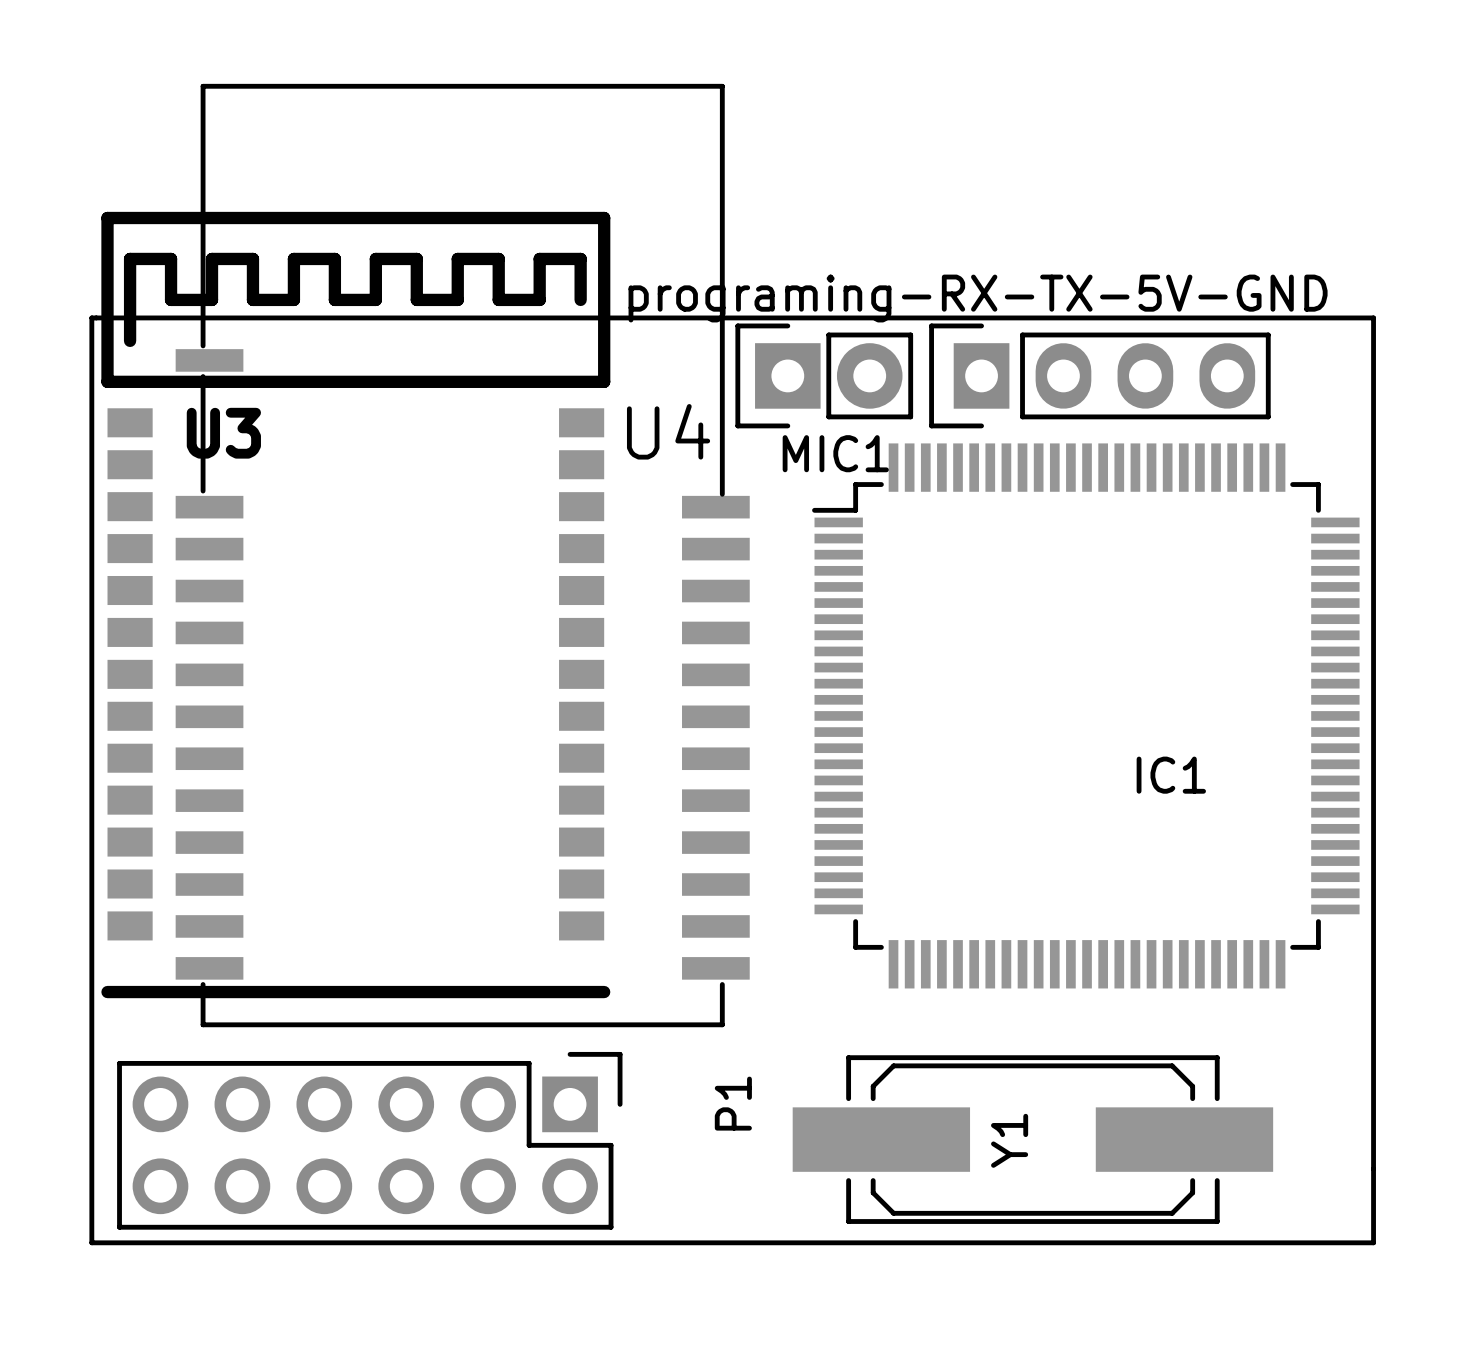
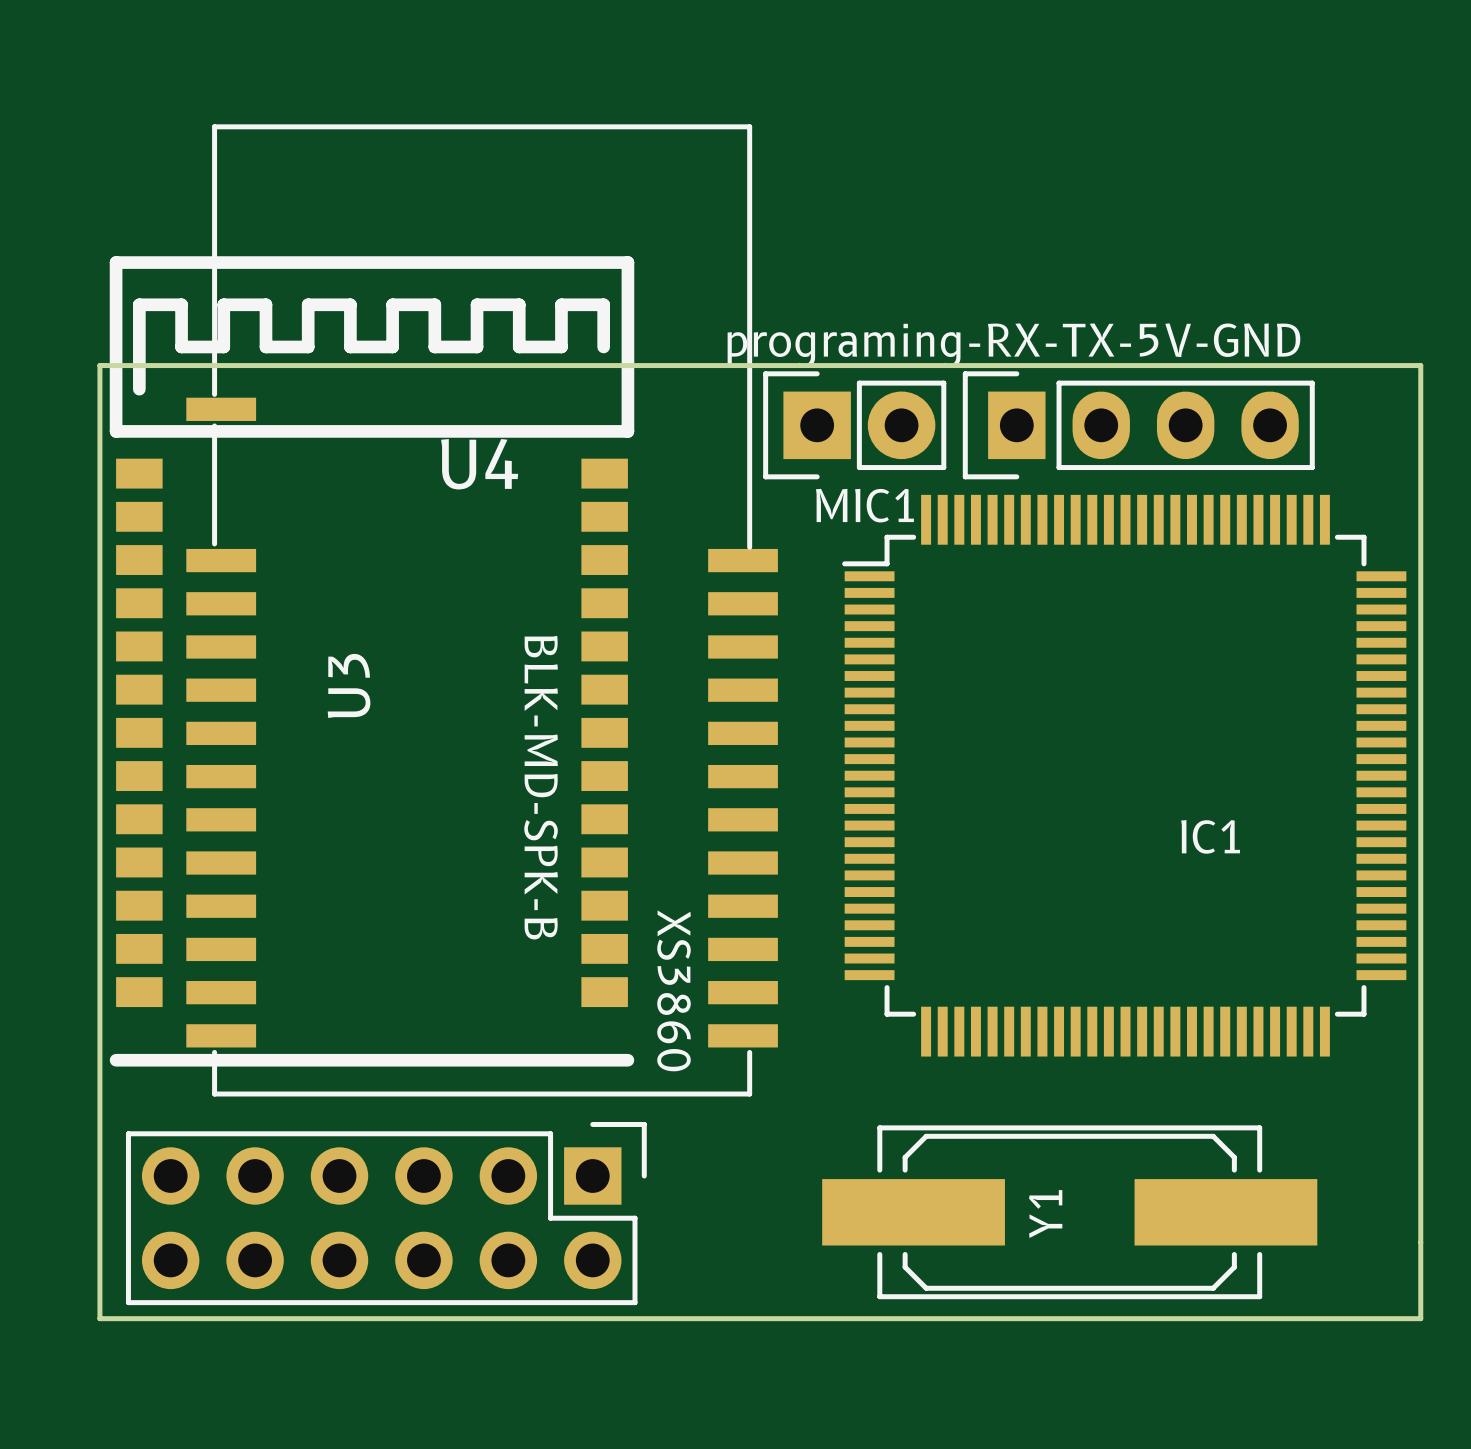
U4 name position: U4 (668, 431) -> U4 (479, 464)
U3 name rotation: 0° (223, 433) -> 90° counterclockwise (349, 685)
U3 name position: U3 (223, 433) -> U3 (349, 685)
text: none -> BLK-MD-SPK-B (541, 787)
text: none -> XS3860 (674, 990)
P1 name: P1 (733, 1103) -> none

